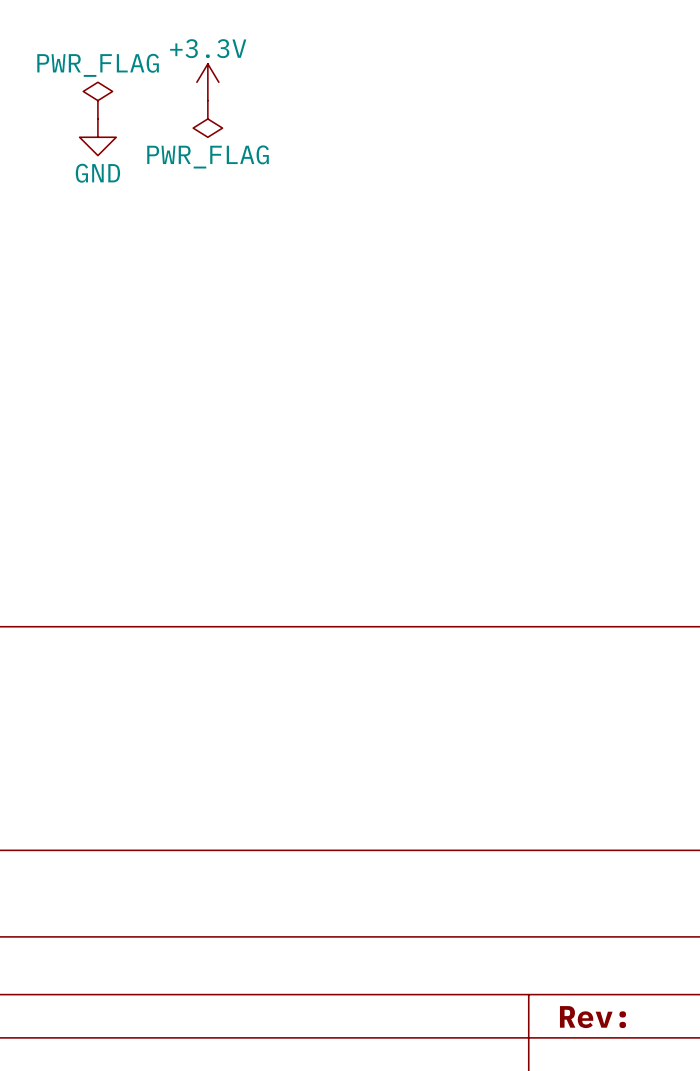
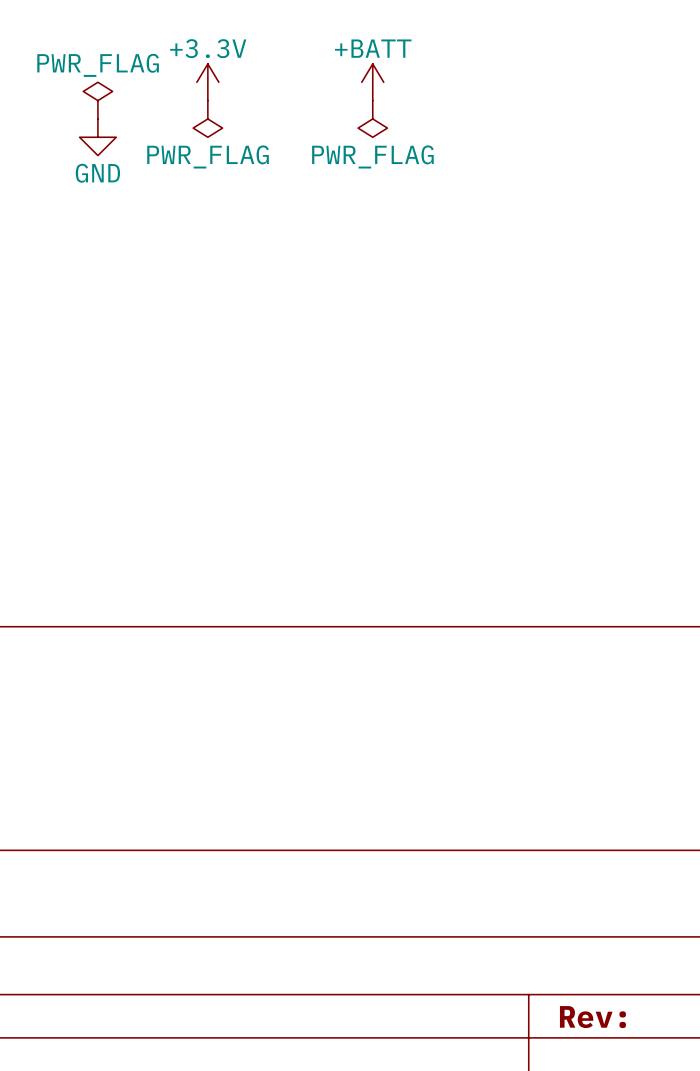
power symbol: none -> +BATT (372, 82)
power symbol: none -> PWR_FLAG (372, 118)

